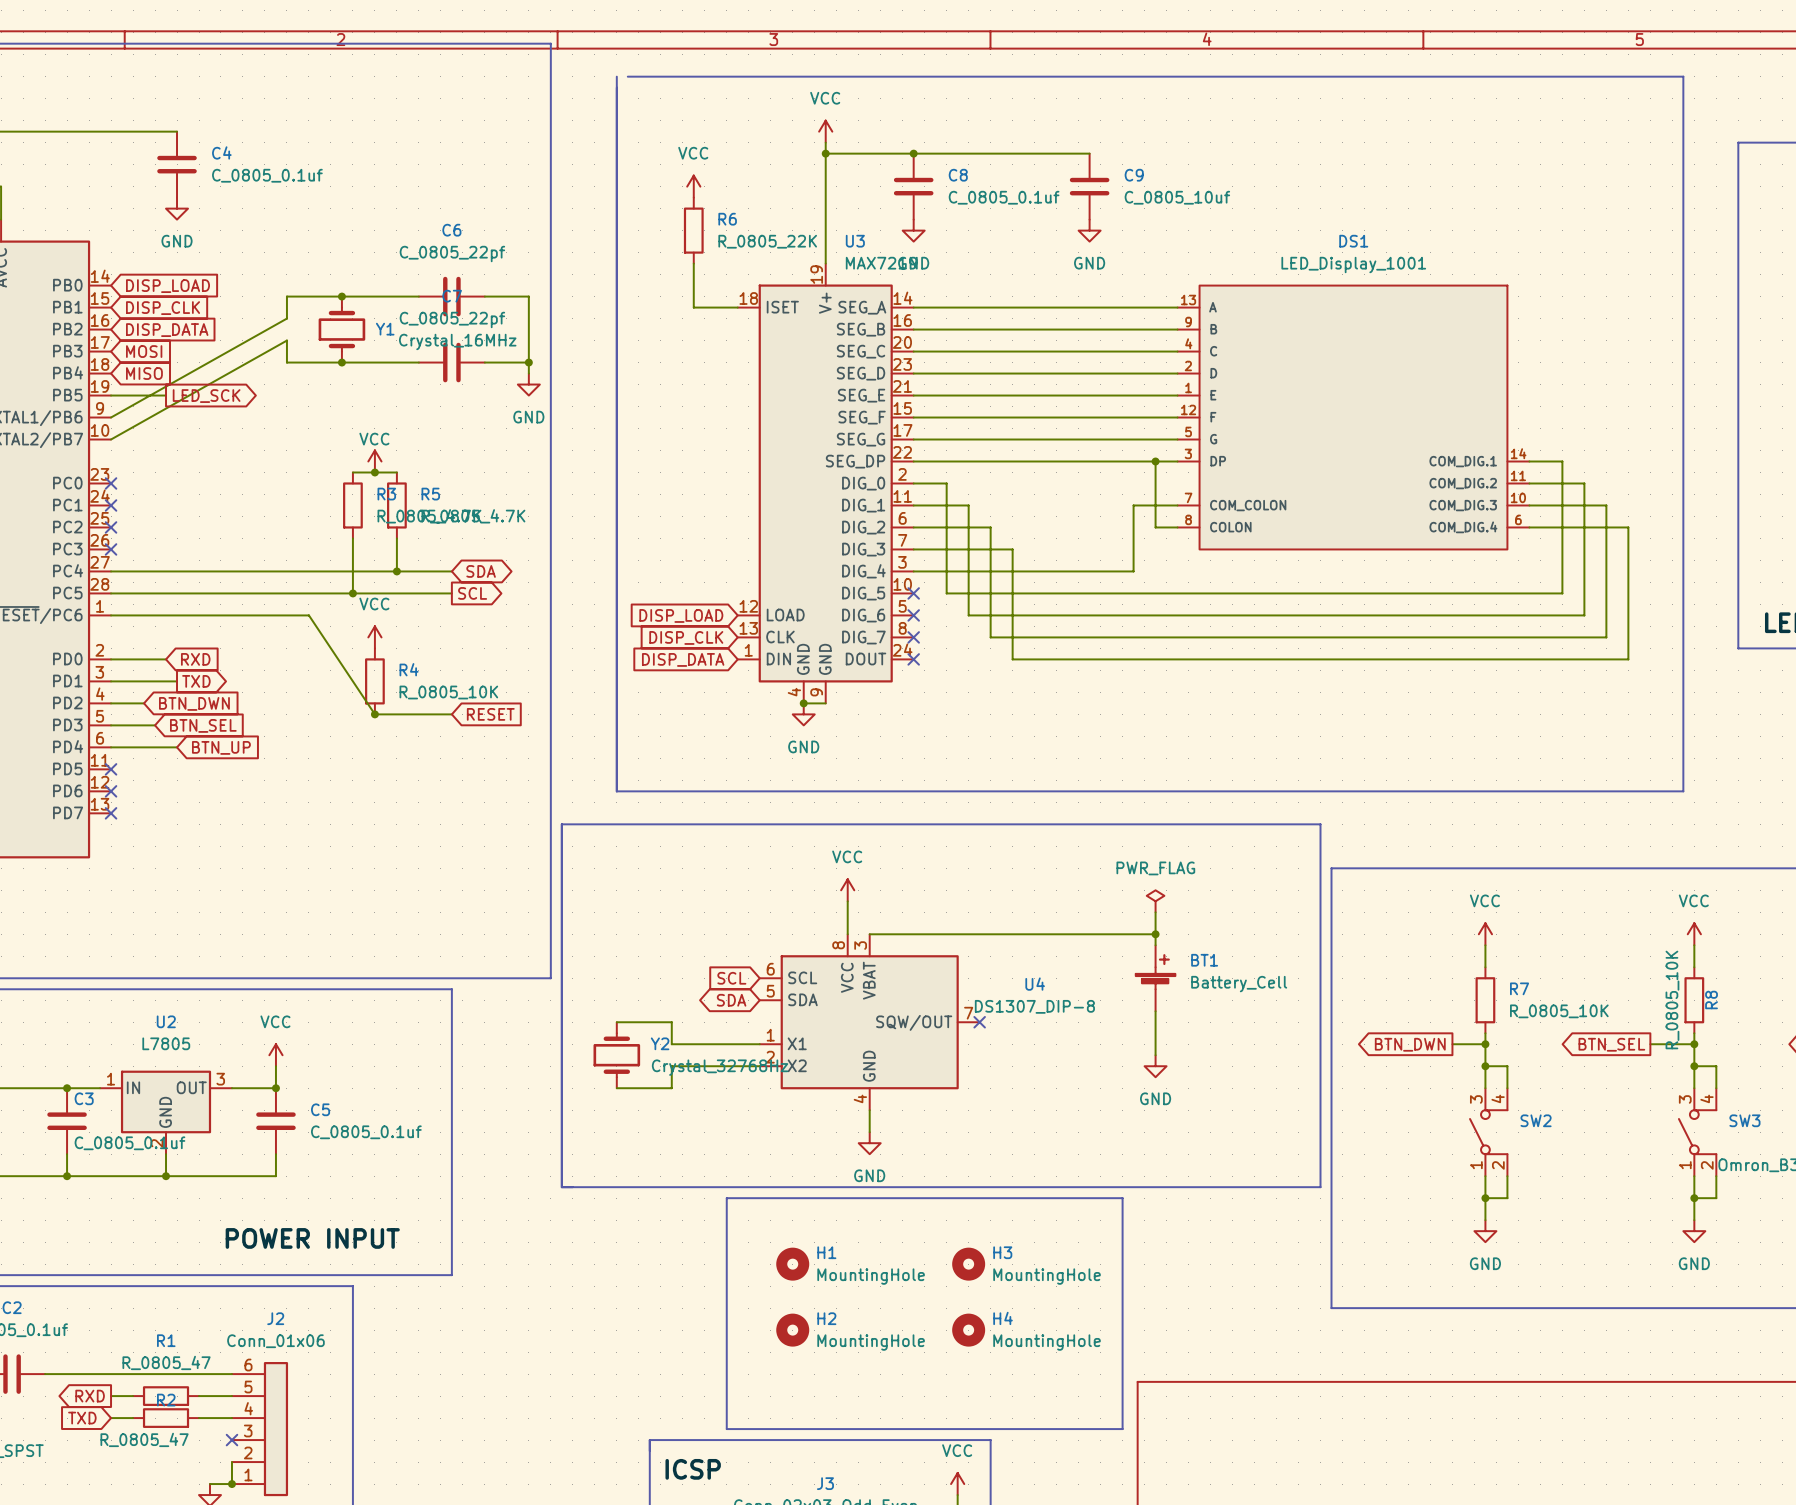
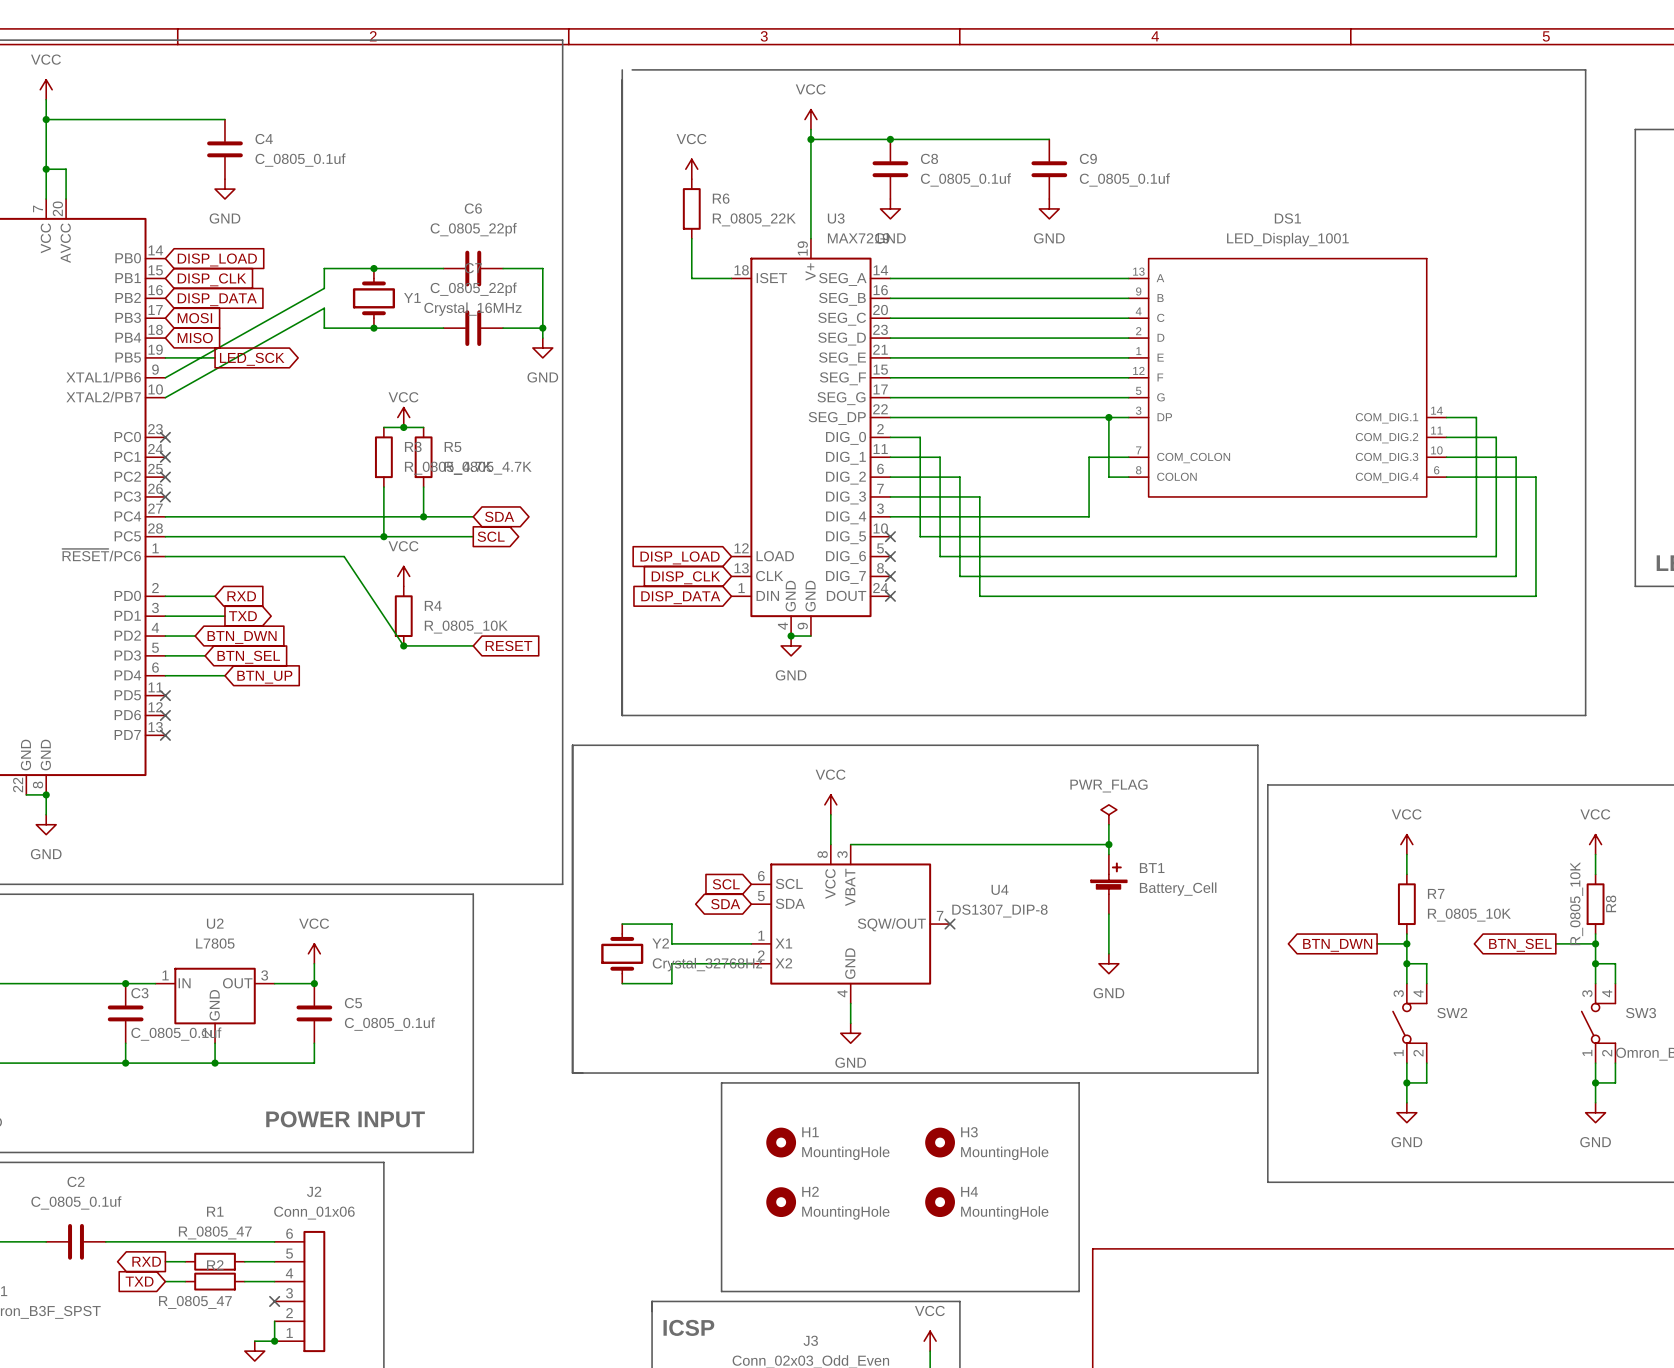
C9 value: C_0805_10uf (1177, 197) -> C_0805_0.1uf (1124, 179)

